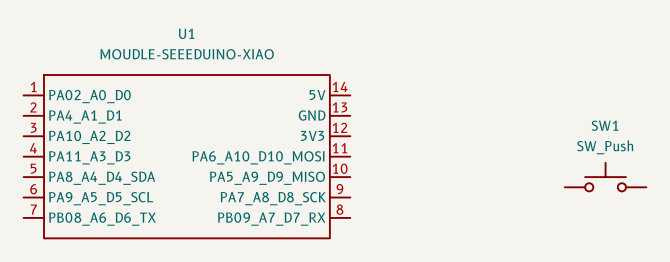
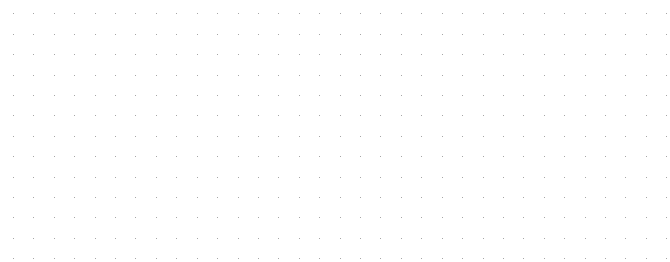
U1: MOUDLE-SEEEDUINO-XIAO (186, 156) -> none
SW1: SW_Push (605, 177) -> none

